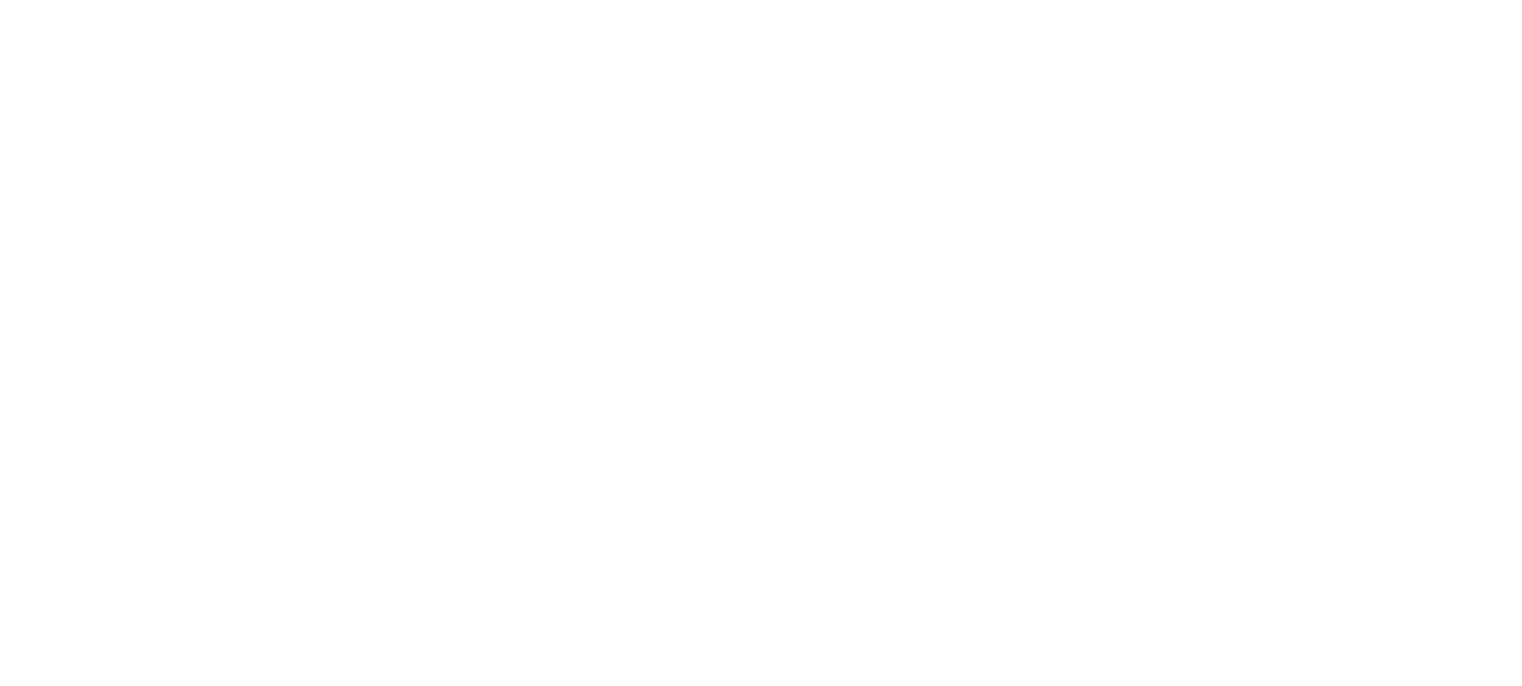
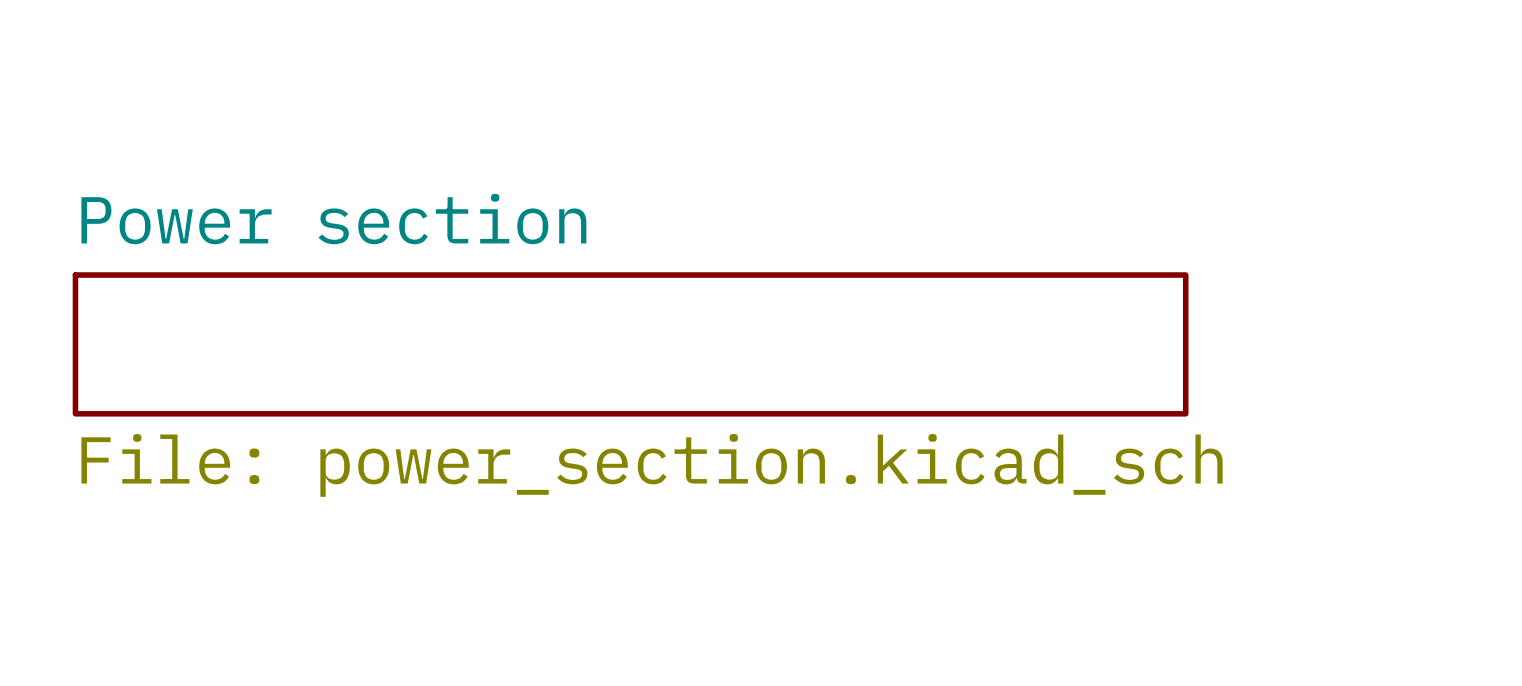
sheet Power section: none -> File: power_section.kicad_sch (630, 344)

